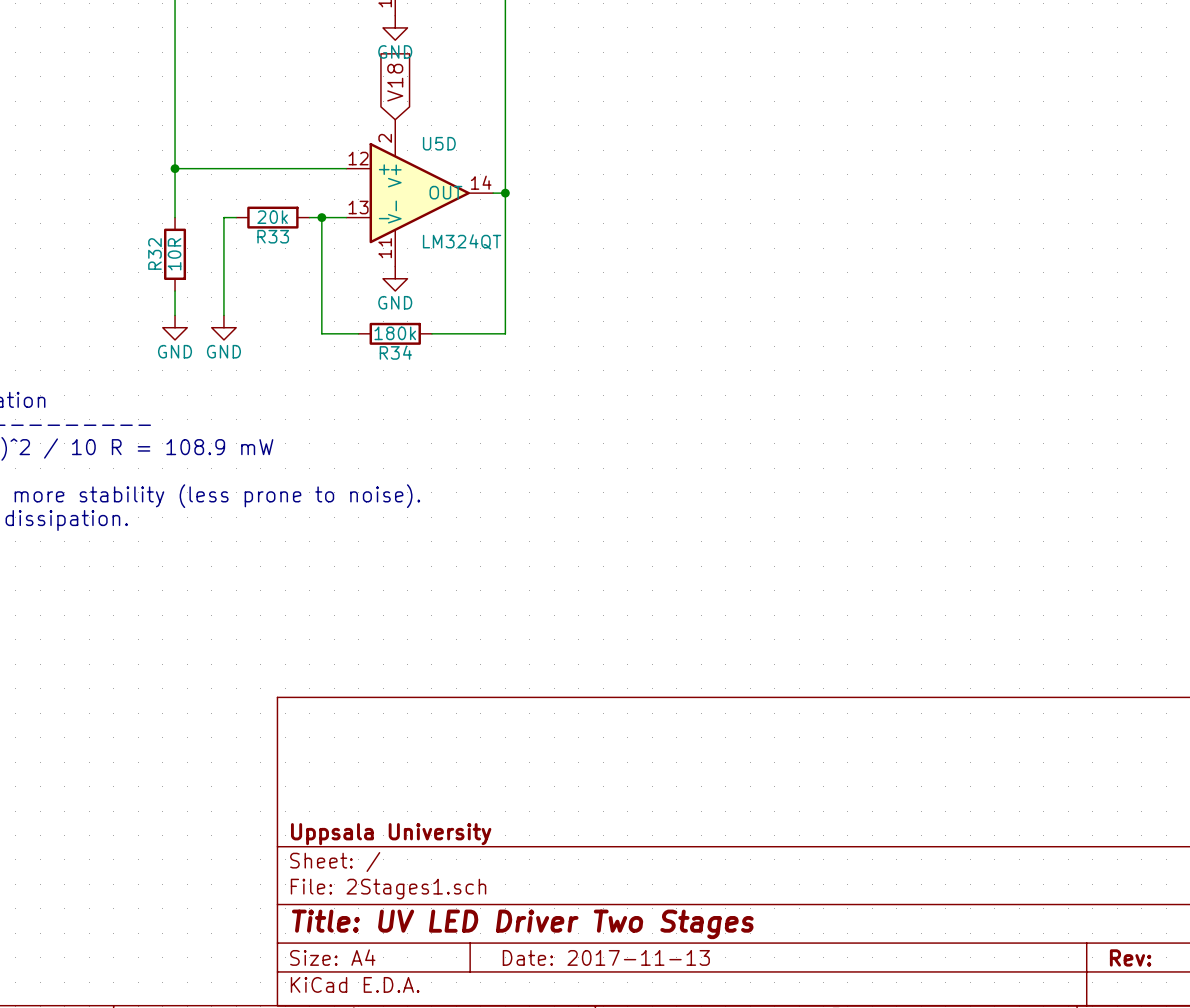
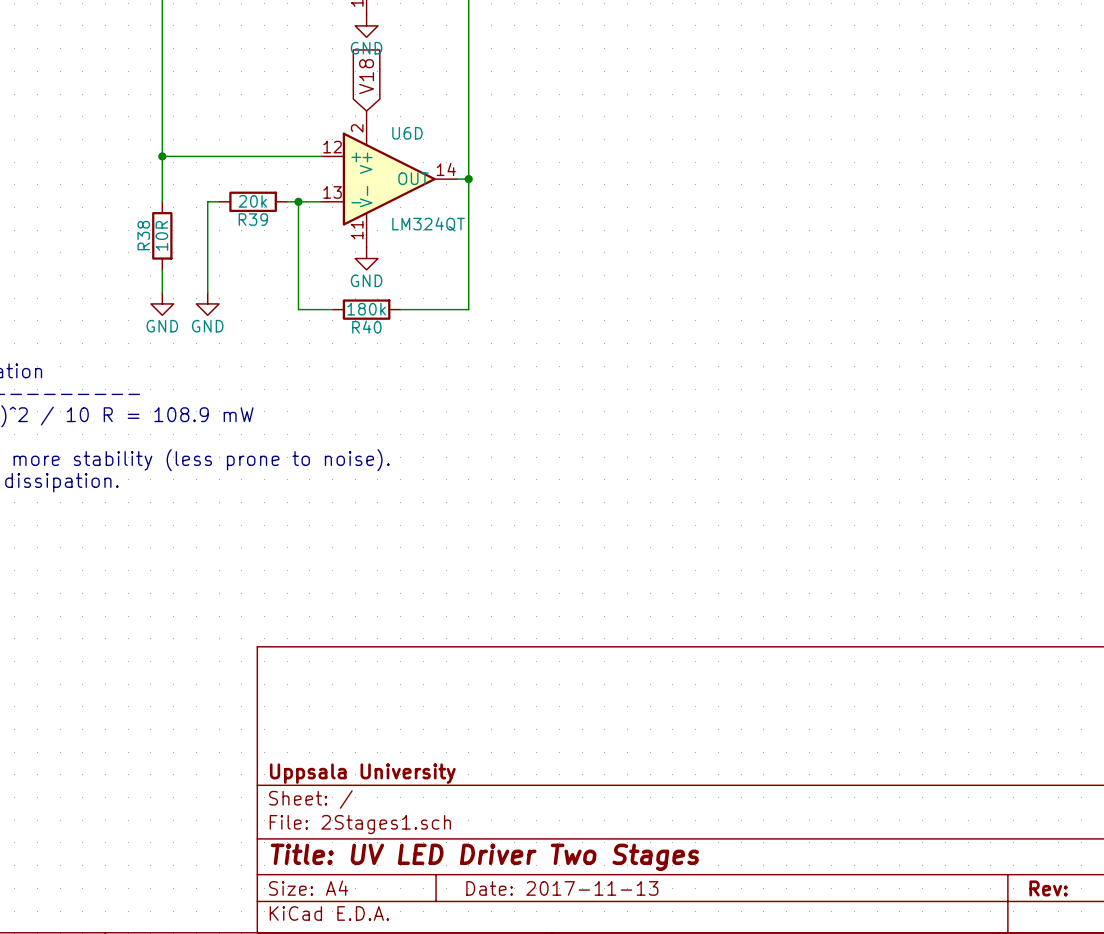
U5D name: U5D (439, 143) -> U6D (407, 133)
R33 name: R33 (273, 236) -> R39 (253, 219)
R32 name: R32 (154, 254) -> R38 (143, 235)
R34 name: R34 (395, 352) -> R40 (366, 327)

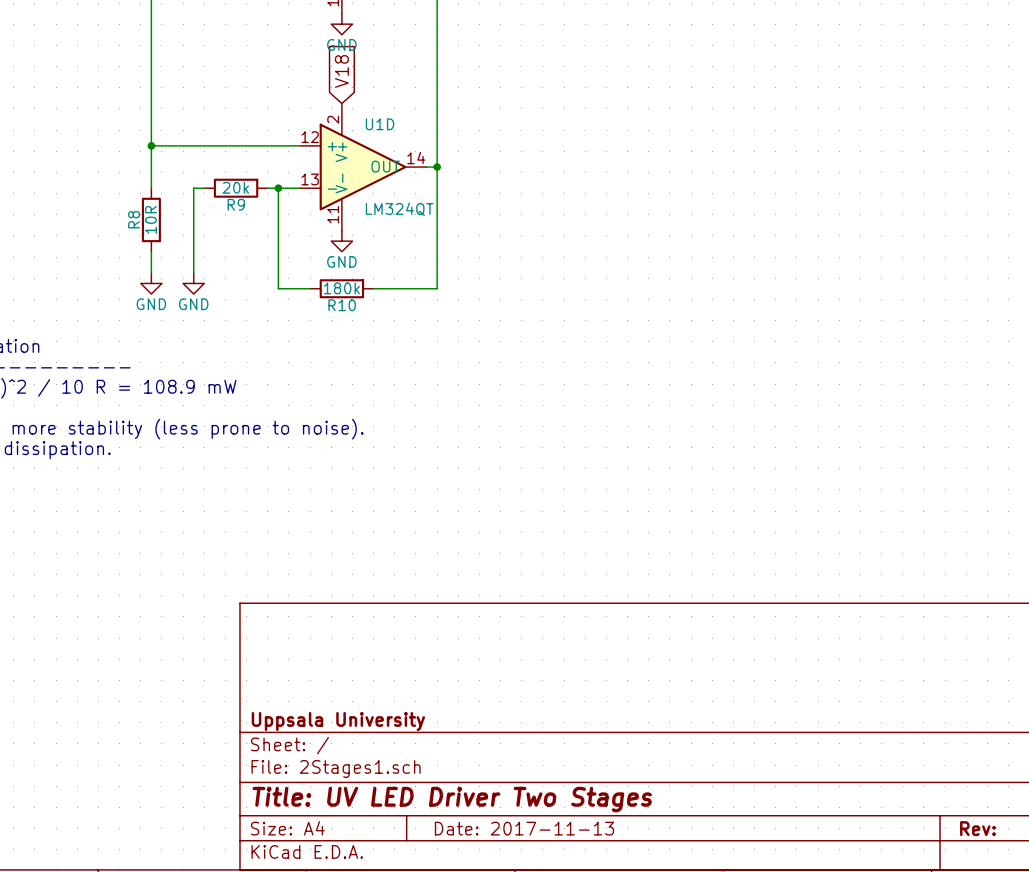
U6D name: U6D (407, 133) -> U1D (380, 124)
R39 name: R39 (253, 219) -> R9 (236, 204)
R38 name: R38 (143, 235) -> R8 (134, 219)
R40 name: R40 (366, 327) -> R10 (342, 305)

